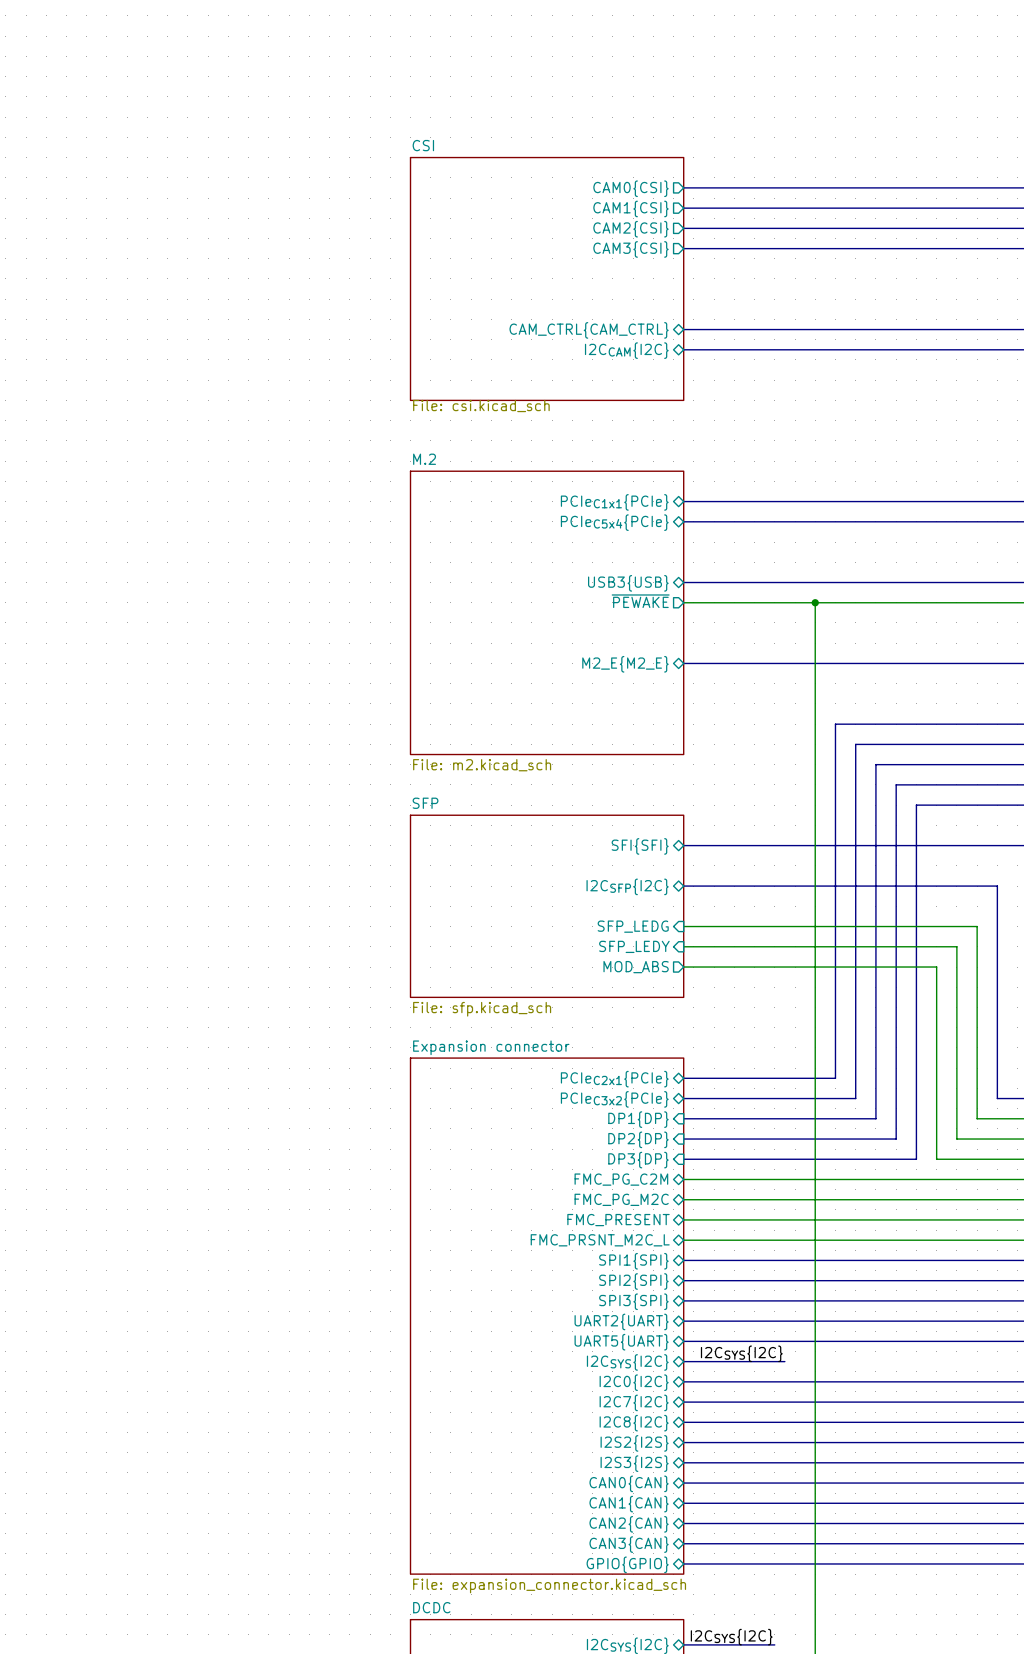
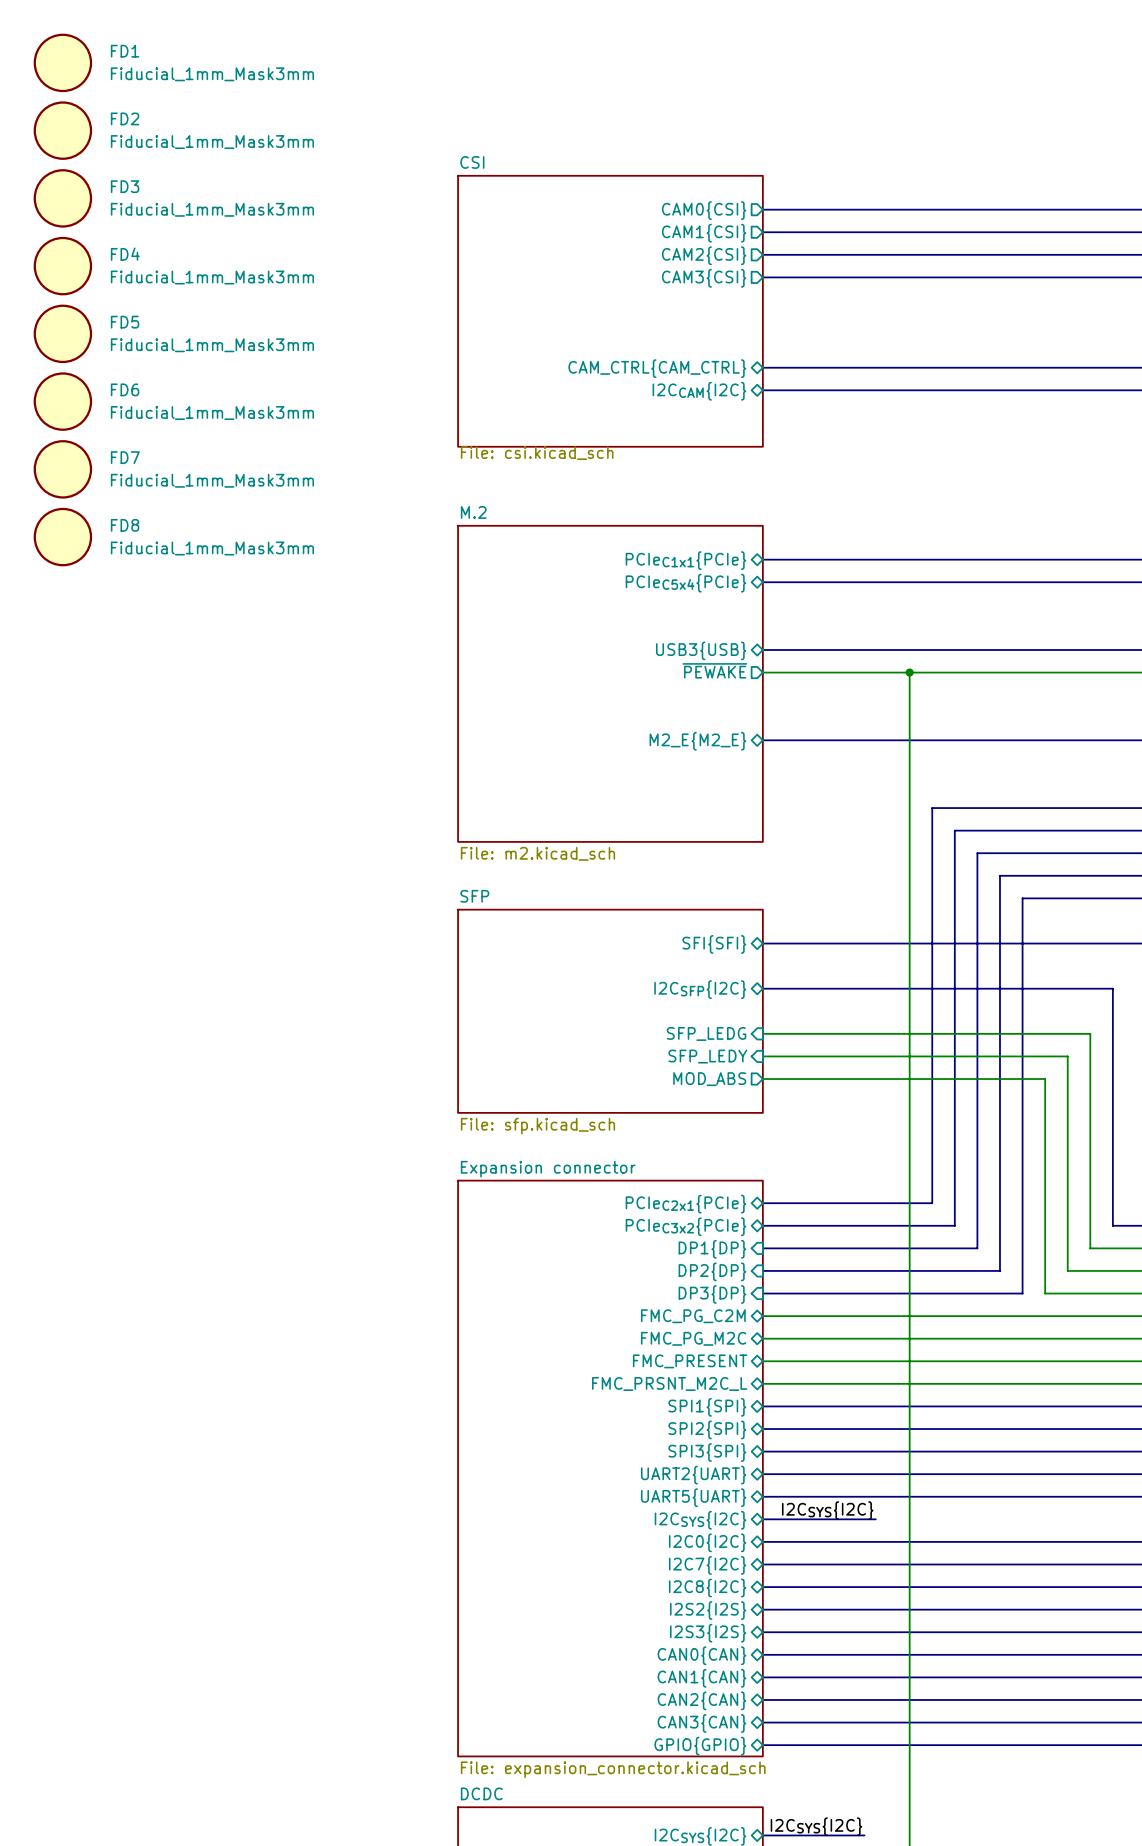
FD1: none -> Fiducial_1mm_Mask3mm (62, 62)
FD2: none -> Fiducial_1mm_Mask3mm (62, 130)
FD3: none -> Fiducial_1mm_Mask3mm (62, 198)
FD4: none -> Fiducial_1mm_Mask3mm (62, 266)
FD5: none -> Fiducial_1mm_Mask3mm (62, 333)
FD6: none -> Fiducial_1mm_Mask3mm (62, 401)
FD7: none -> Fiducial_1mm_Mask3mm (62, 469)
FD8: none -> Fiducial_1mm_Mask3mm (62, 537)

